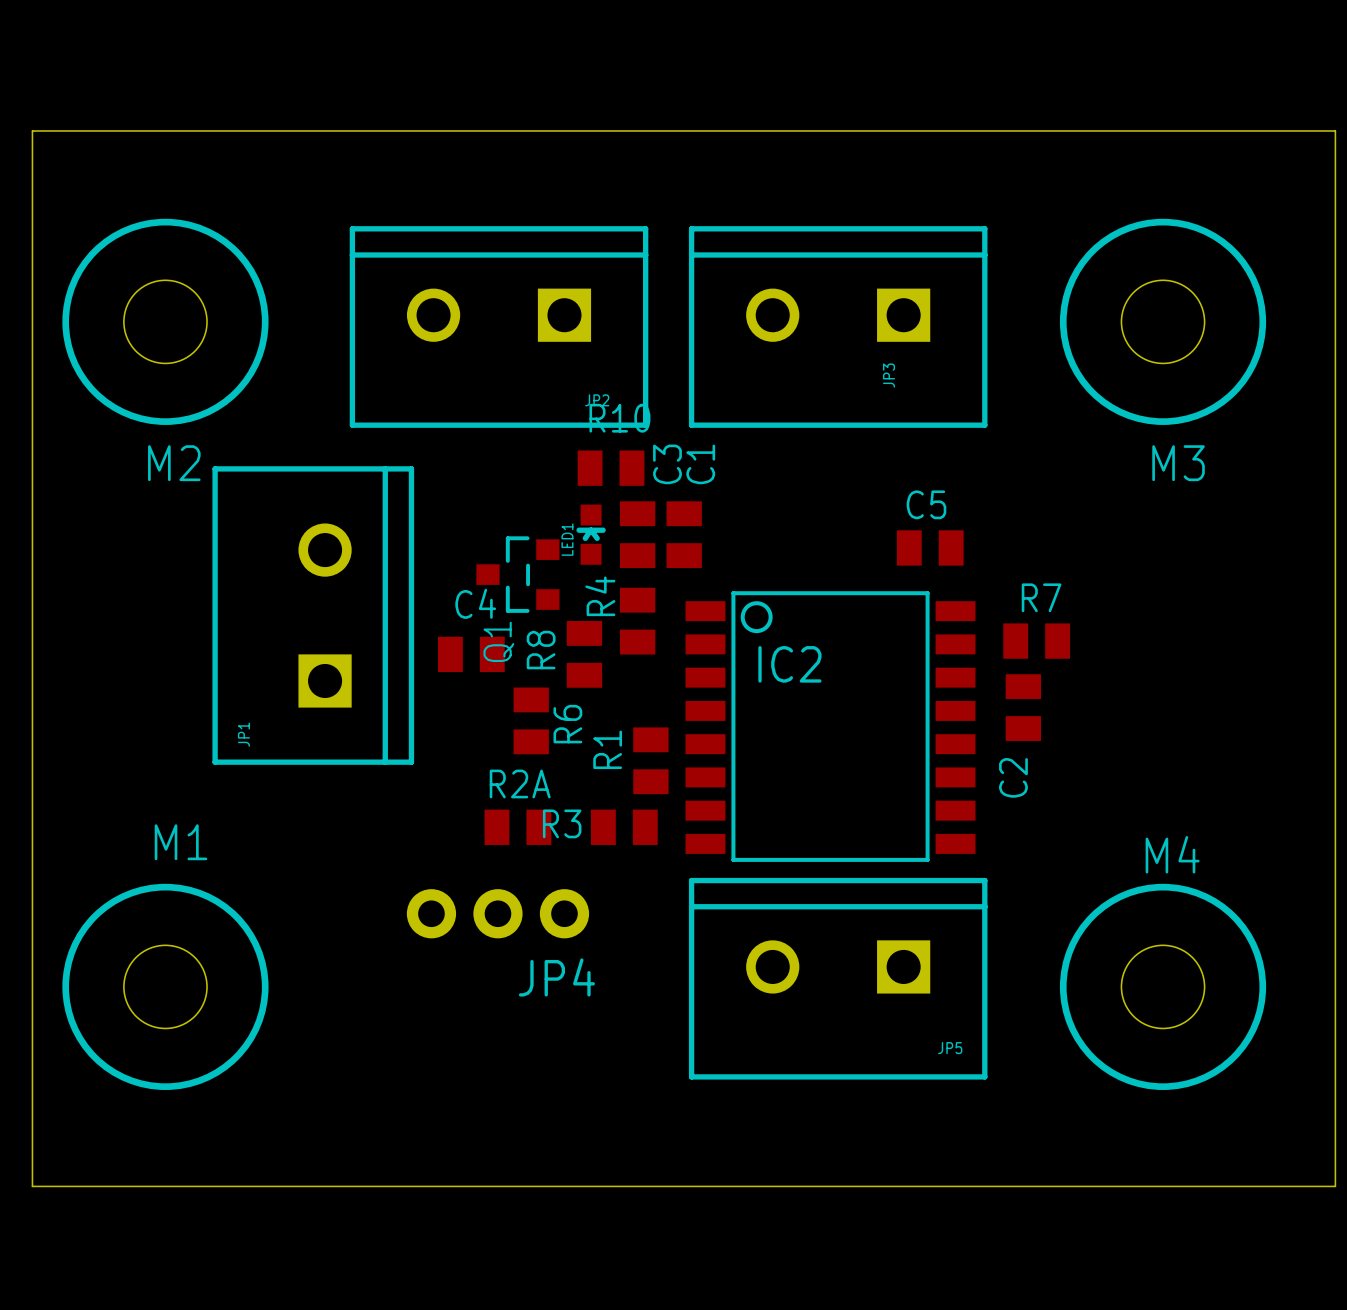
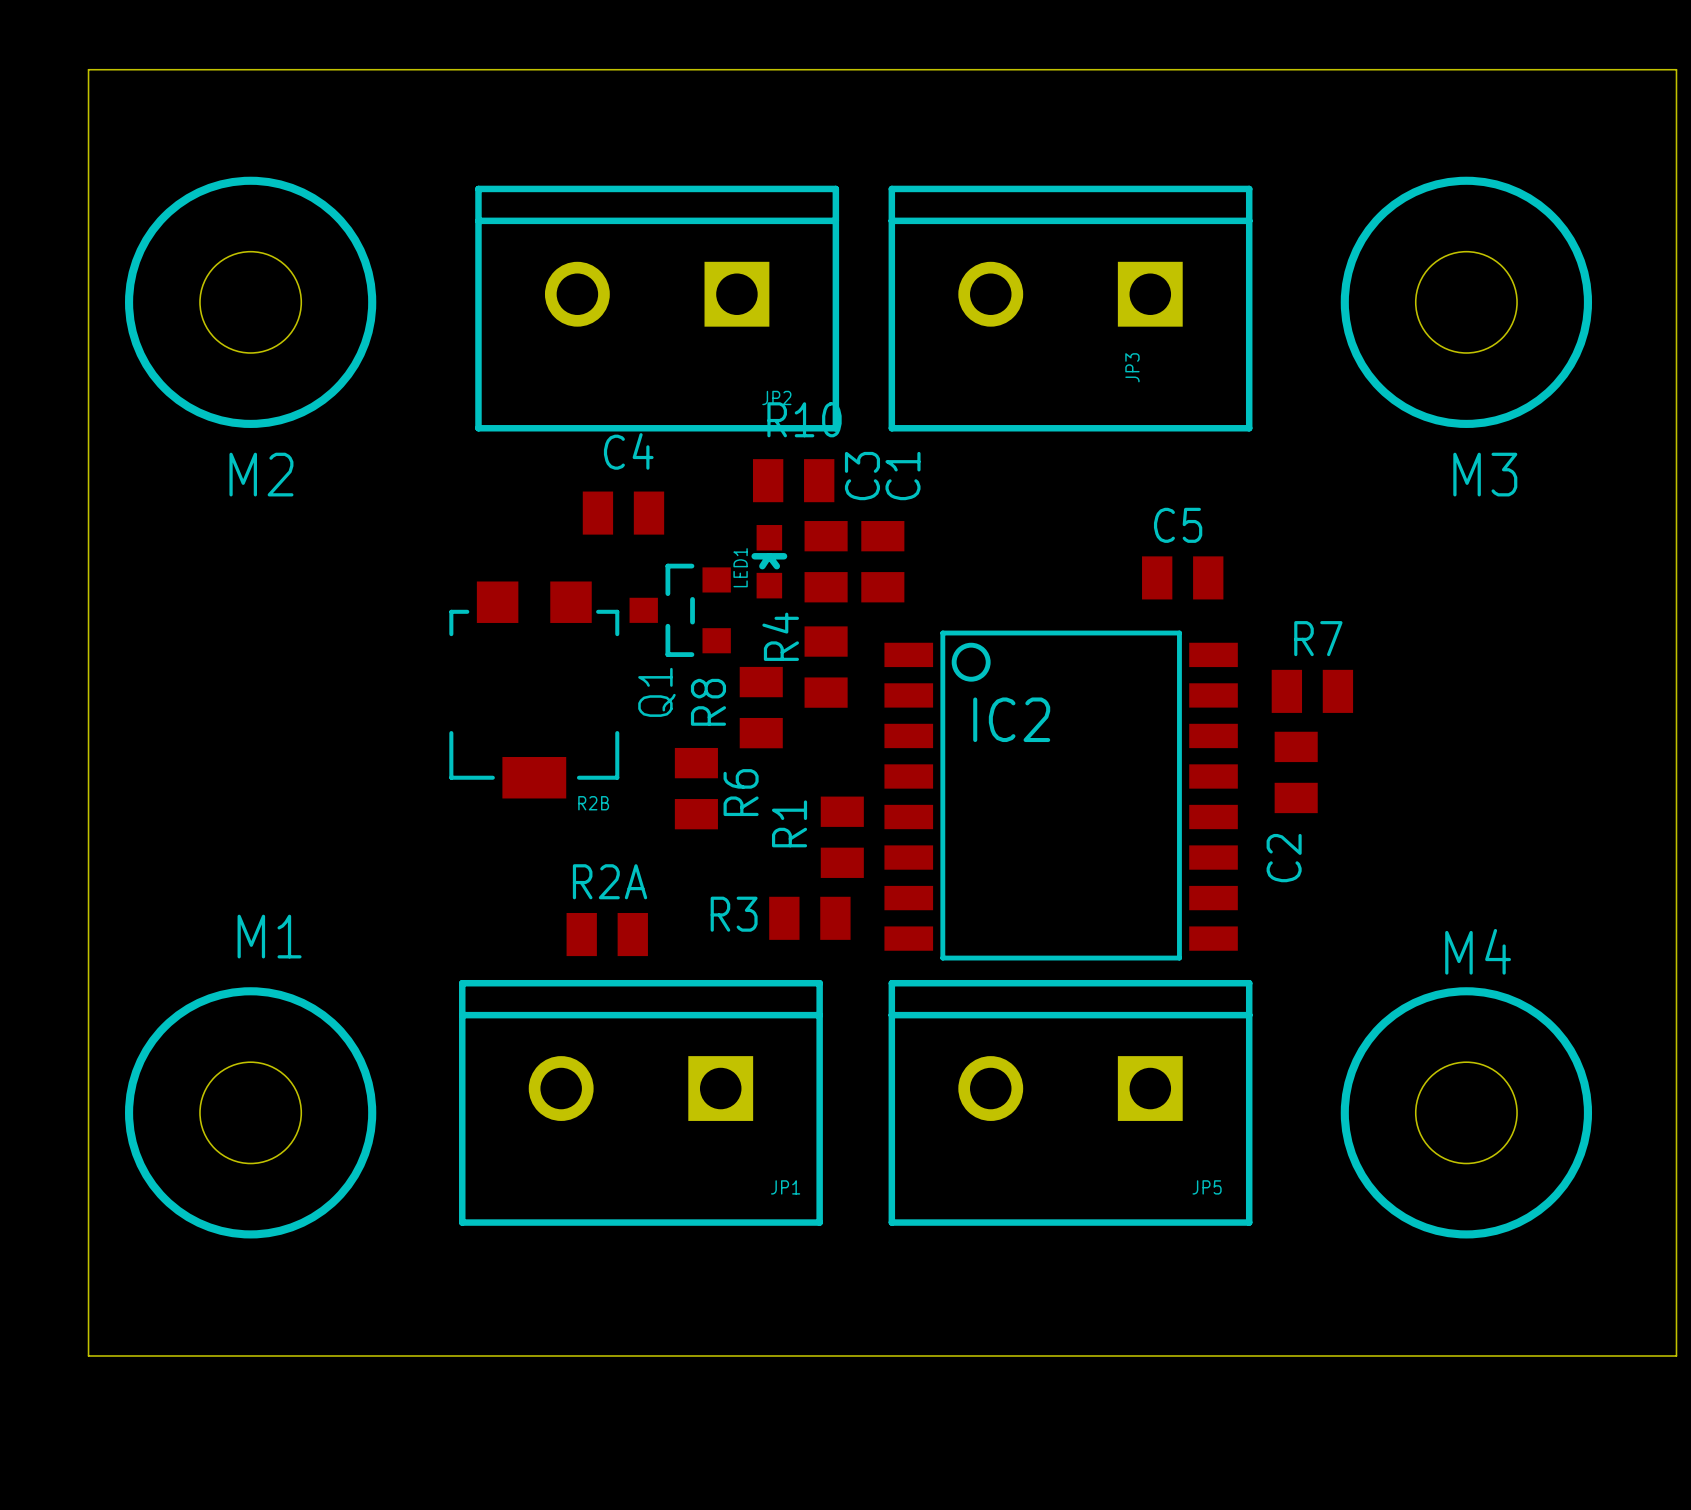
JP1 rotation: 0° (313, 615) -> 90° counterclockwise (640, 1102)
JP1 position: (313, 615) -> (640, 1102)
R2B: none -> (534, 689)
C4 position: (471, 654) -> (623, 513)
R2A position: (517, 827) -> (607, 934)
JP4: (497, 913) -> none

